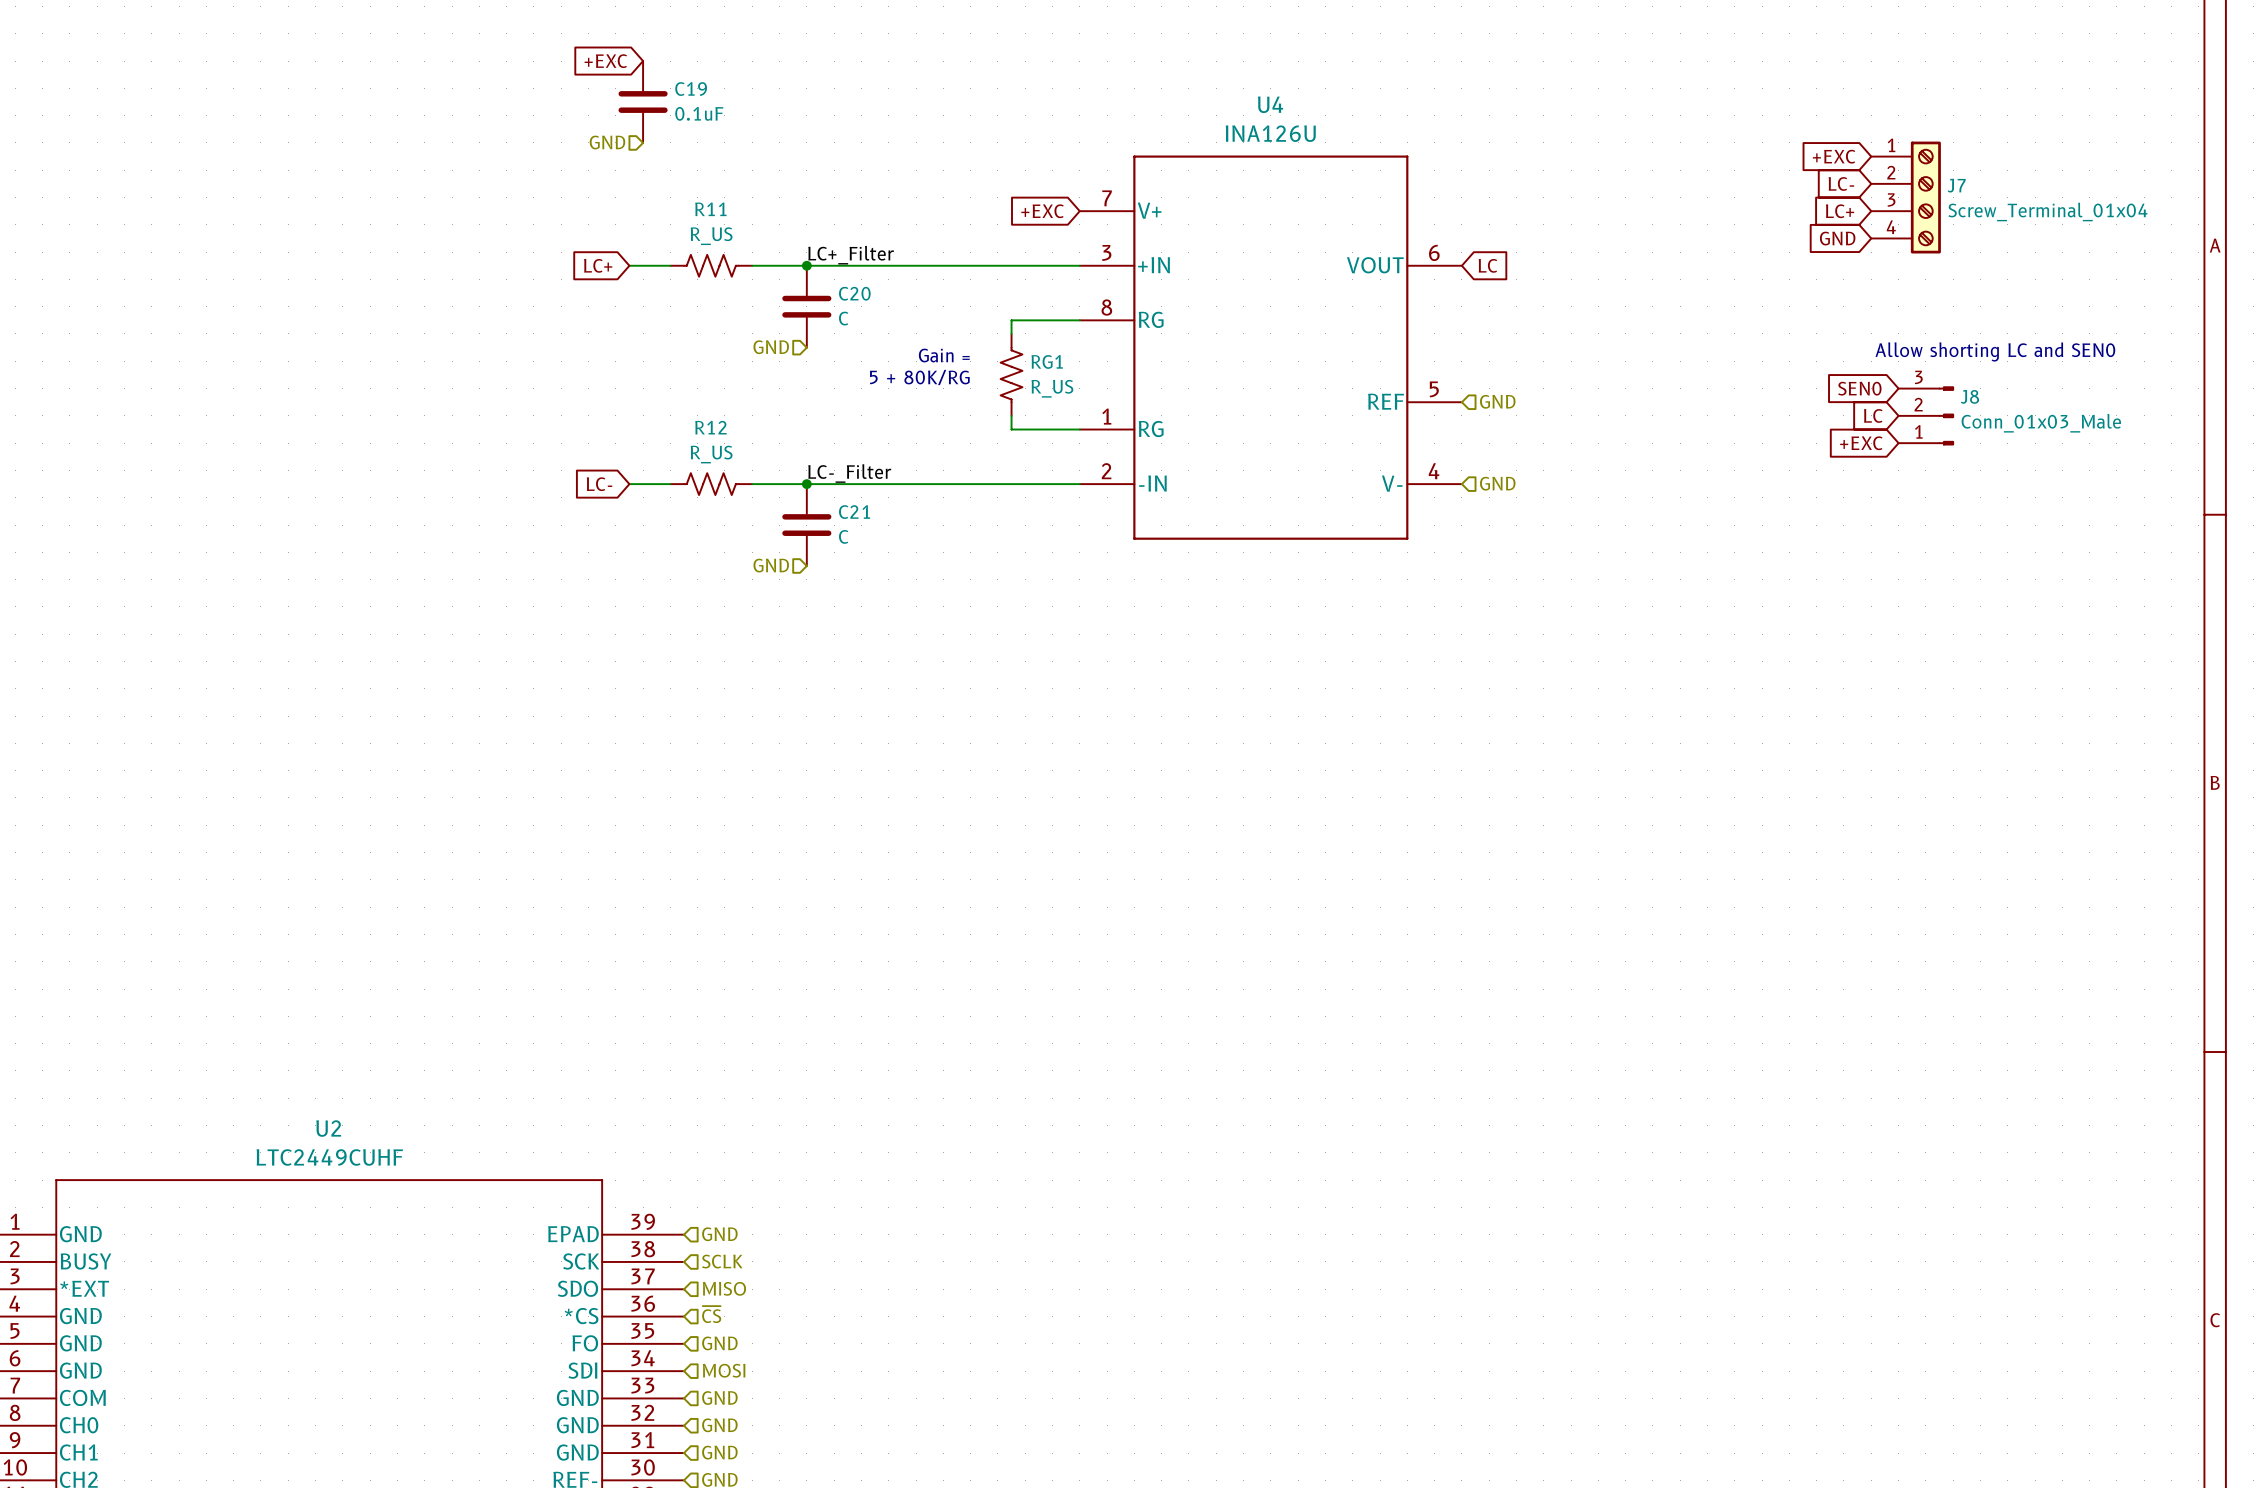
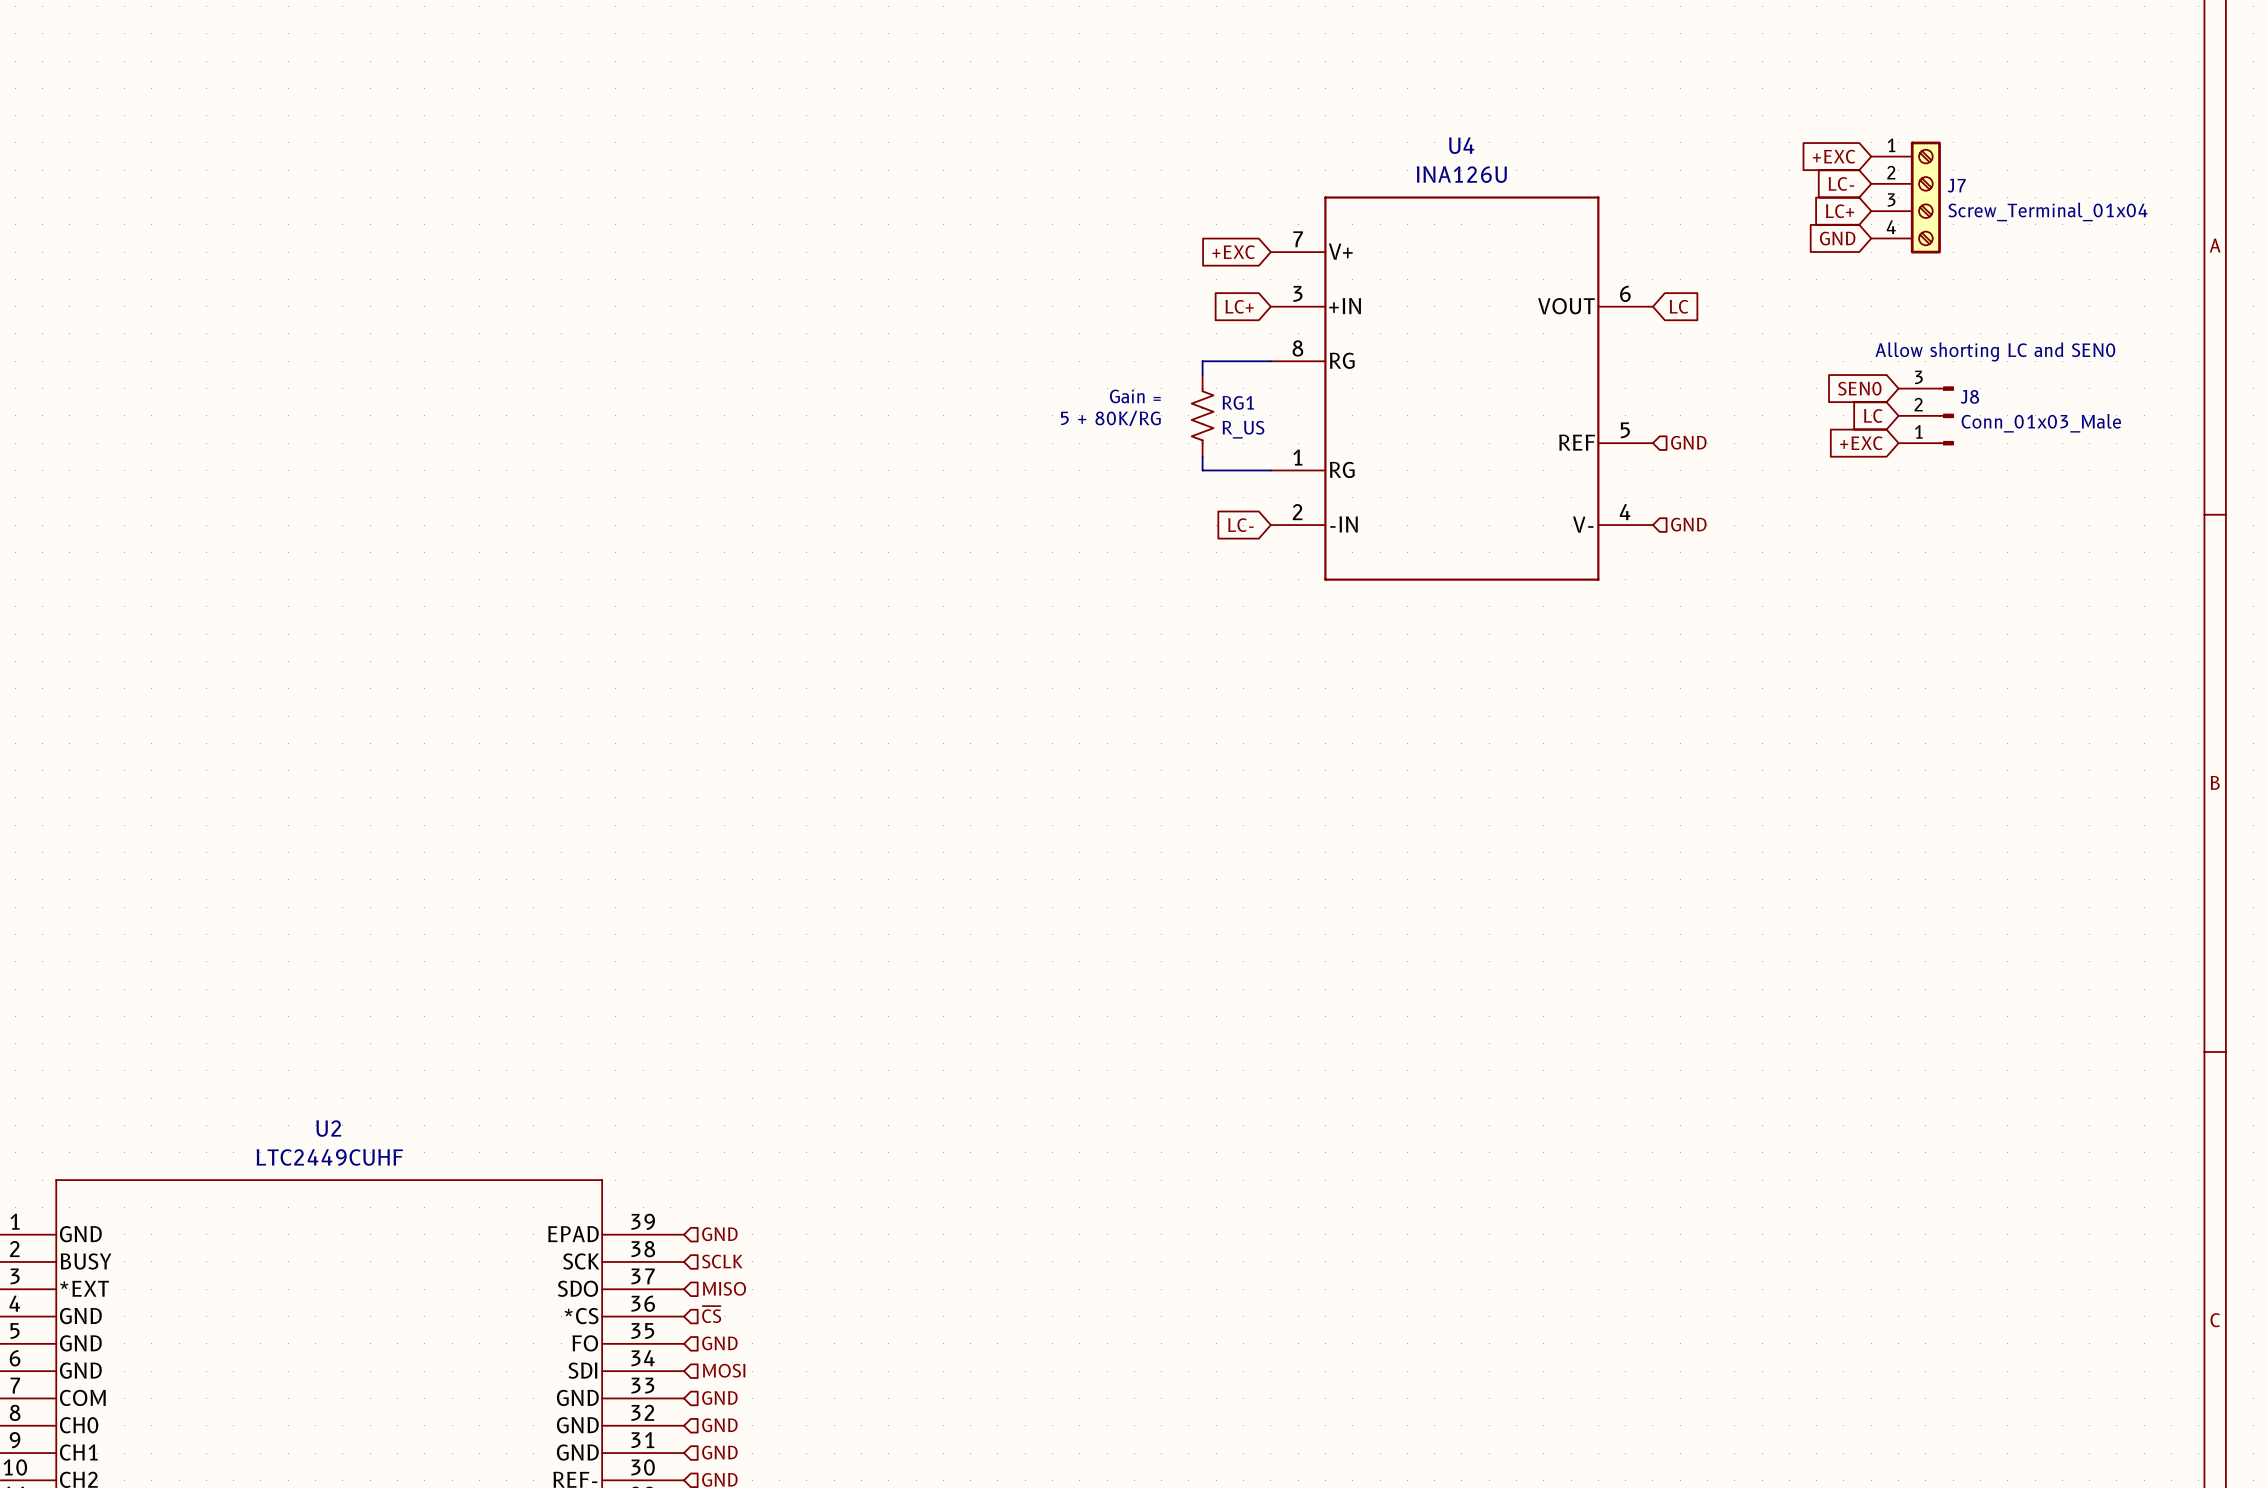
global label: +EXC (605, 61) -> none
C19: 0.1uF (643, 102) -> none
hierarchical label: GND (607, 142) -> none
global label position: +EXC (1042, 211) -> +EXC (1233, 252)
label: LC+_Filter (851, 255) -> none
global label: LC+ (598, 265) -> none
wire: (629, 265) (670, 265) -> none
R11: R_US (711, 265) -> none
wire: (752, 265) (1079, 265) -> none
junction: (806, 265) -> none
global label position: LC (1487, 265) -> LC (1678, 306)
C20: C (806, 306) -> none
global label: none -> LC+ (1239, 306)
wire: (1079, 320) (1011, 320) (1011, 333) -> (1270, 361) (1202, 361) (1202, 374)
hierarchical label: GND (771, 347) -> none
U4 position: (1270, 347) -> (1461, 388)
text position: Gain = (944, 355) -> Gain = (1135, 396)
RG1 position: (1011, 374) -> (1202, 415)
text position: 5 + 80K/RG (919, 377) -> 5 + 80K/RG (1110, 418)
hierarchical label: GND (1497, 401) -> none
wire: (1011, 415) (1011, 429) (1079, 429) -> (1202, 456) (1202, 470) (1270, 470)
hierarchical label: none -> GND (1688, 442)
label: LC-_Filter (849, 473) -> none
hierarchical label: GND (1497, 483) -> none
global label: LC- (599, 484) -> none
wire: (629, 484) (670, 484) -> none
R12: R_US (711, 484) -> none
wire: (752, 484) (1079, 484) -> none
junction: (806, 484) -> none
hierarchical label: none -> GND (1688, 524)
C21: C (806, 525) -> none
global label: none -> LC- (1240, 525)
hierarchical label: GND (771, 565) -> none

